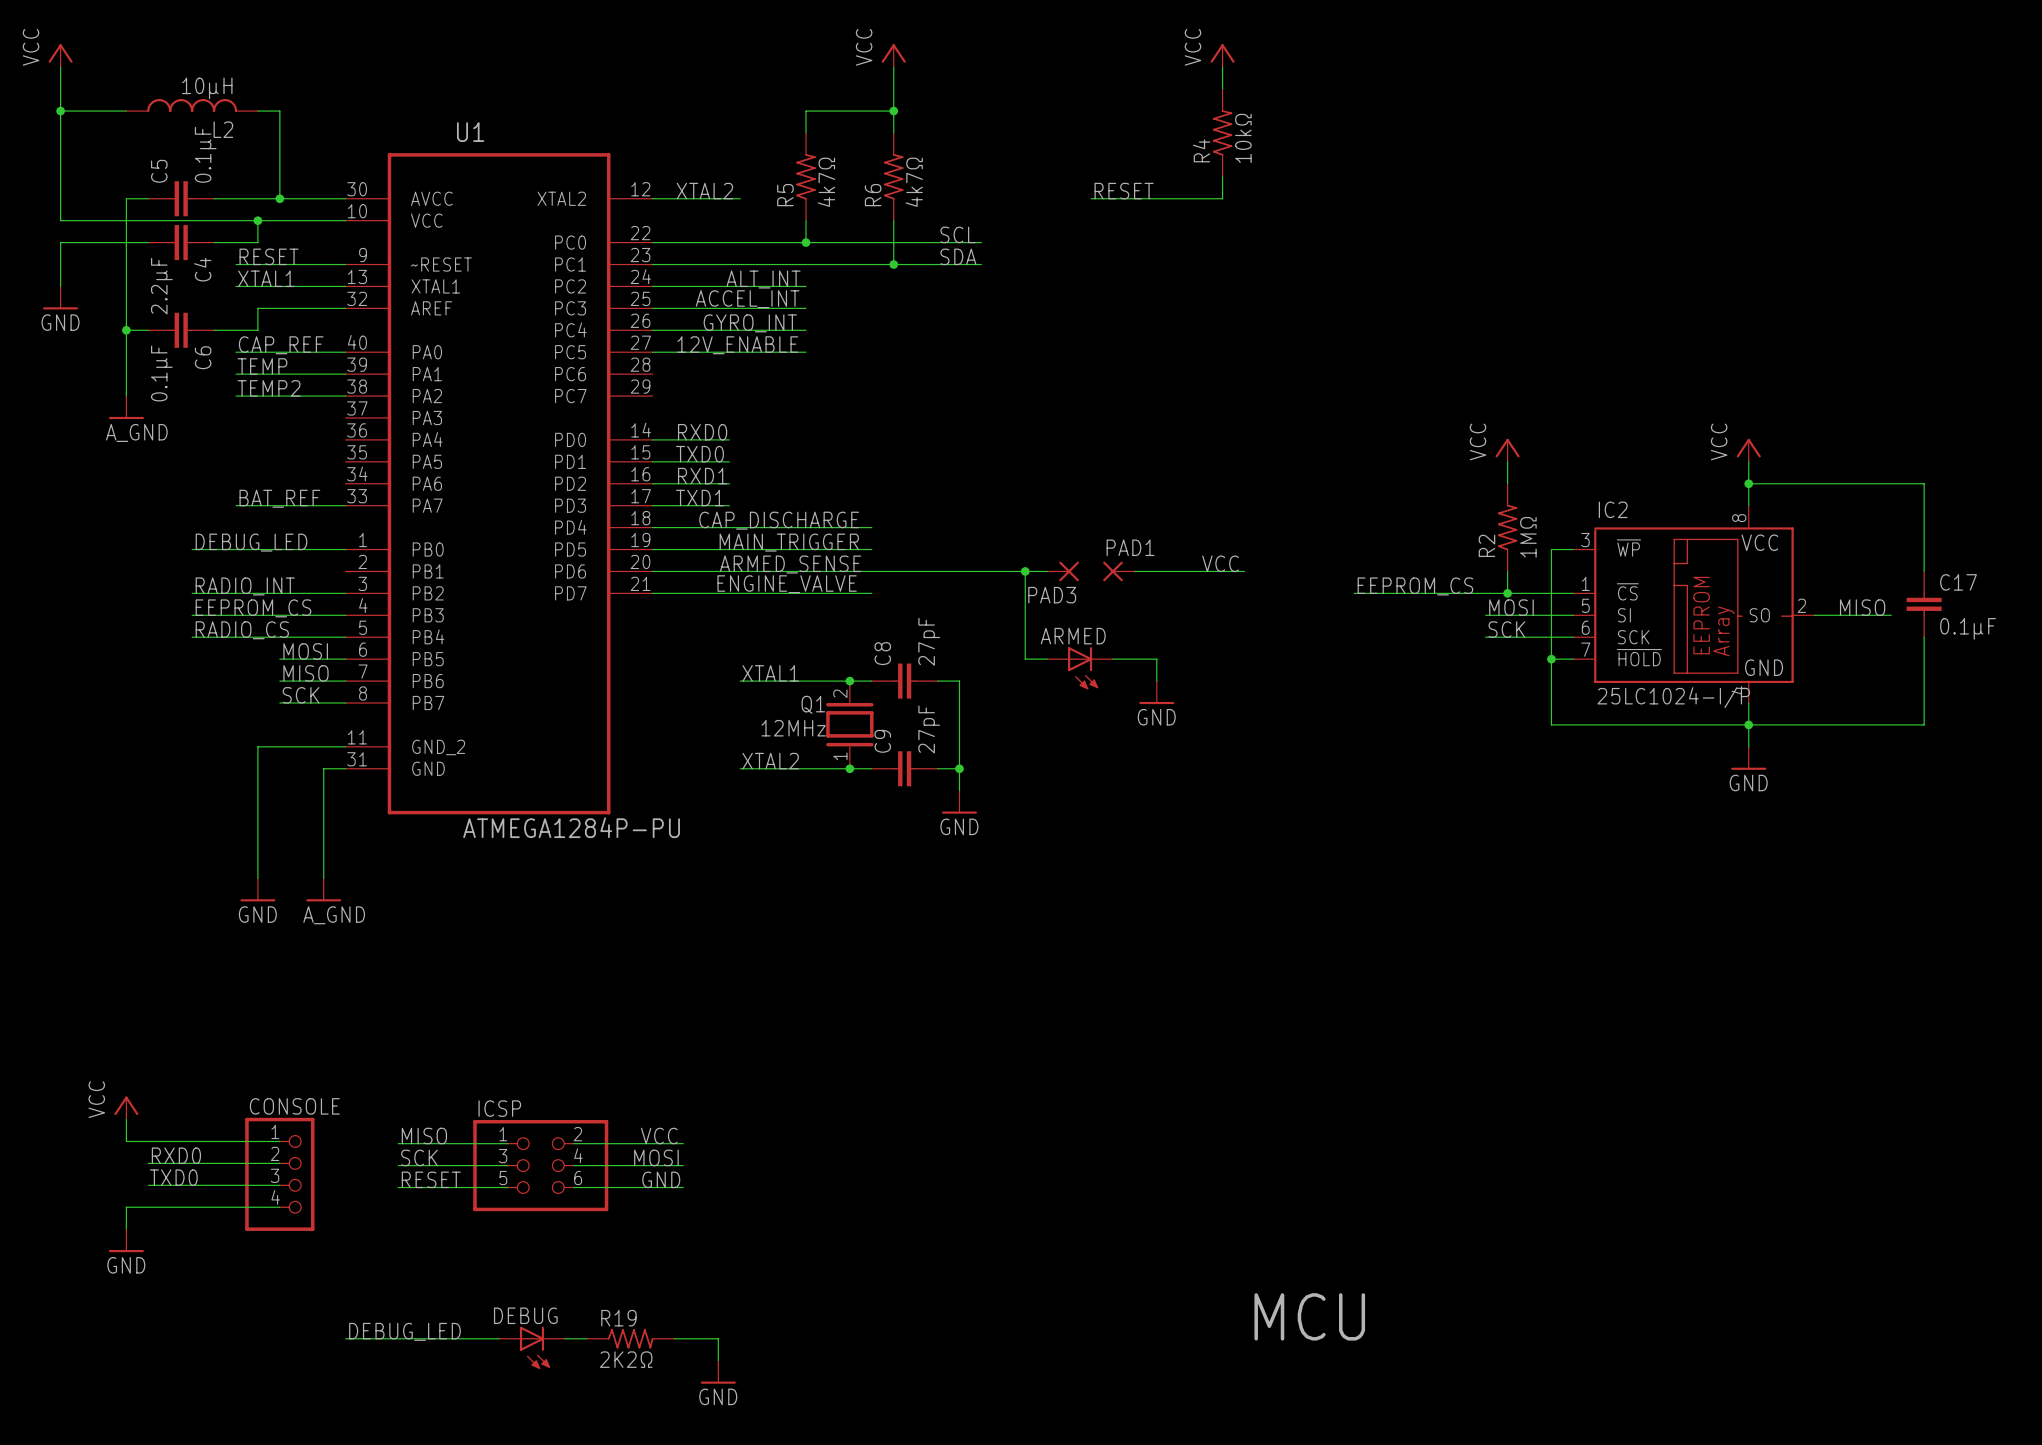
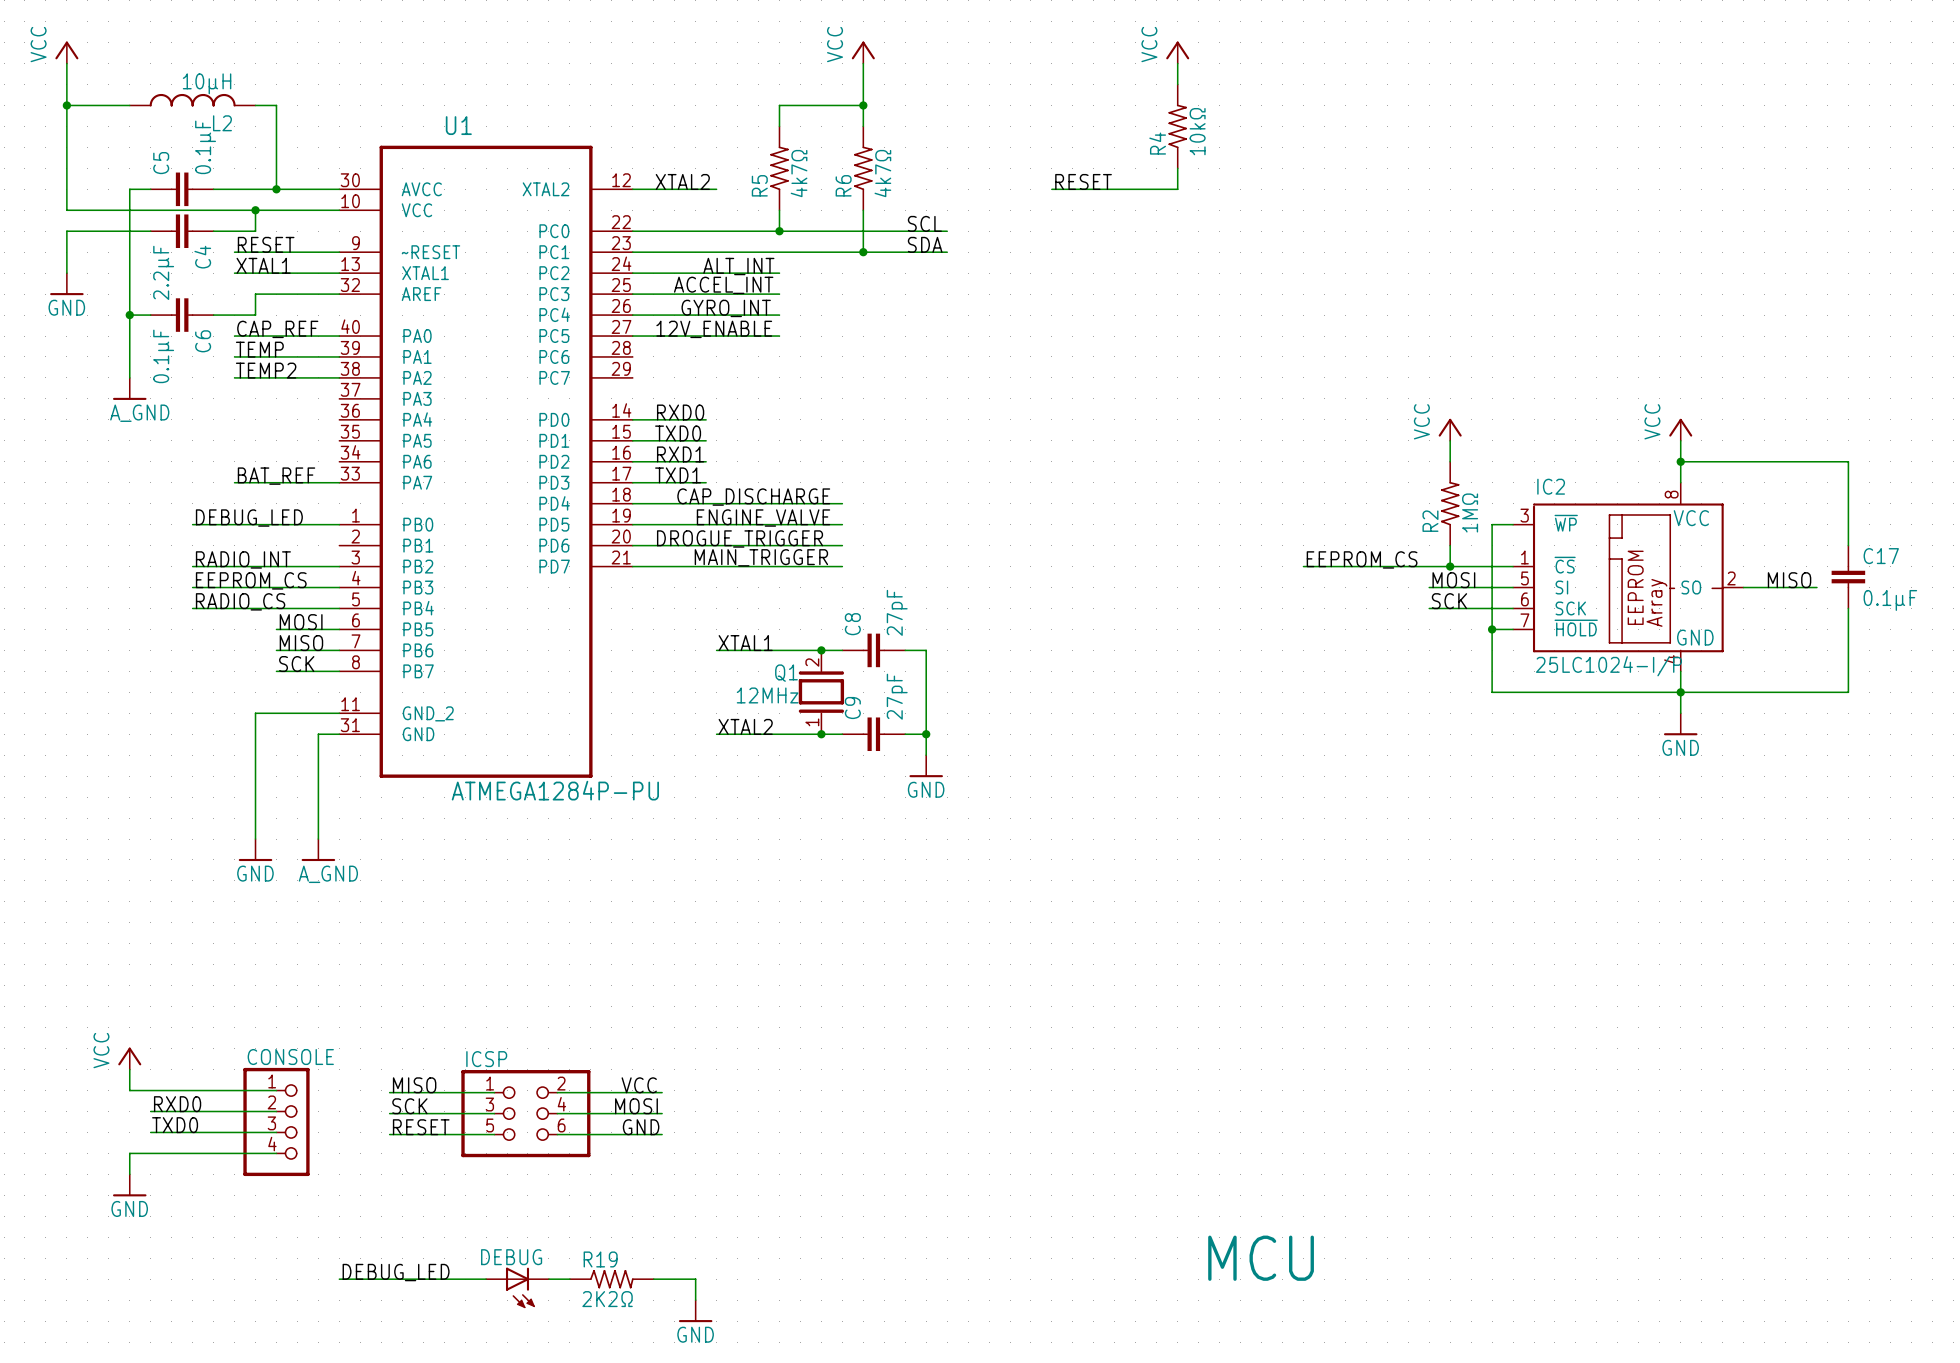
label: MAIN_TRIGGER (789, 542) -> ENGINE_VALVE (763, 518)
label: VCC (1220, 563) -> none
label: none -> DROGUE_TRIGGER (740, 538)
label: ARMED_SENSE (790, 564) -> none
wire: (871, 571) (1047, 571) -> none
wire: (1025, 571) (1025, 659) (1047, 659) -> none
junction: (1025, 571) -> none
PAD3: (1063, 571) -> none
PAD1: (1118, 571) -> none
wire: (1134, 571) (1244, 571) -> none
label: ENGINE_VALVE (787, 584) -> MAIN_TRIGGER (761, 557)
wire: (1112, 659) (1156, 659) (1156, 681) -> none
ARMED: (1080, 668) -> none
power symbol: GND (1156, 692) -> none

